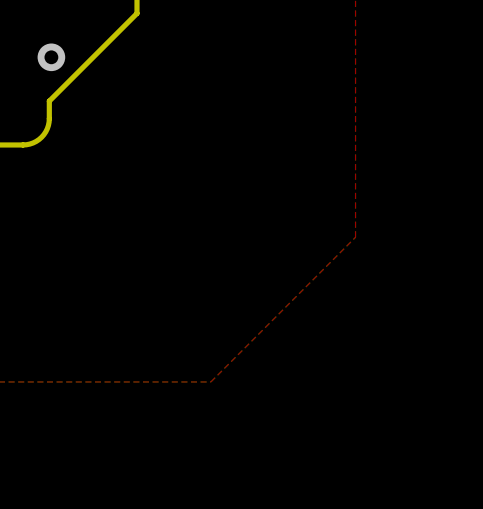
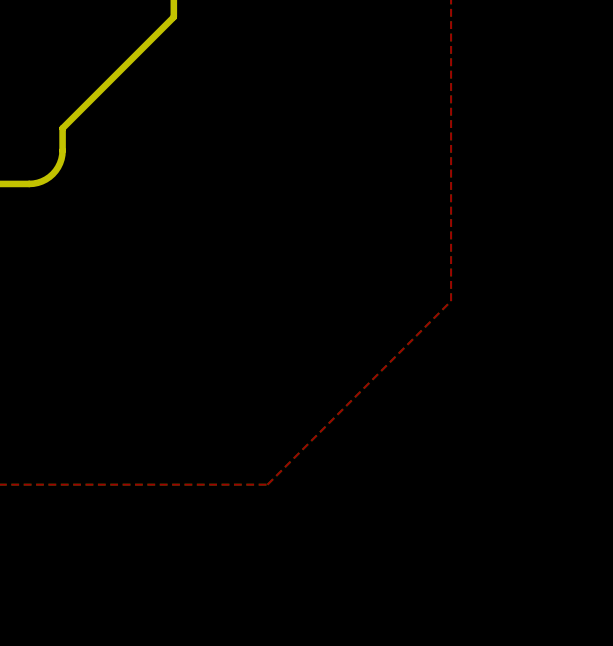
via: (51, 57) -> none

